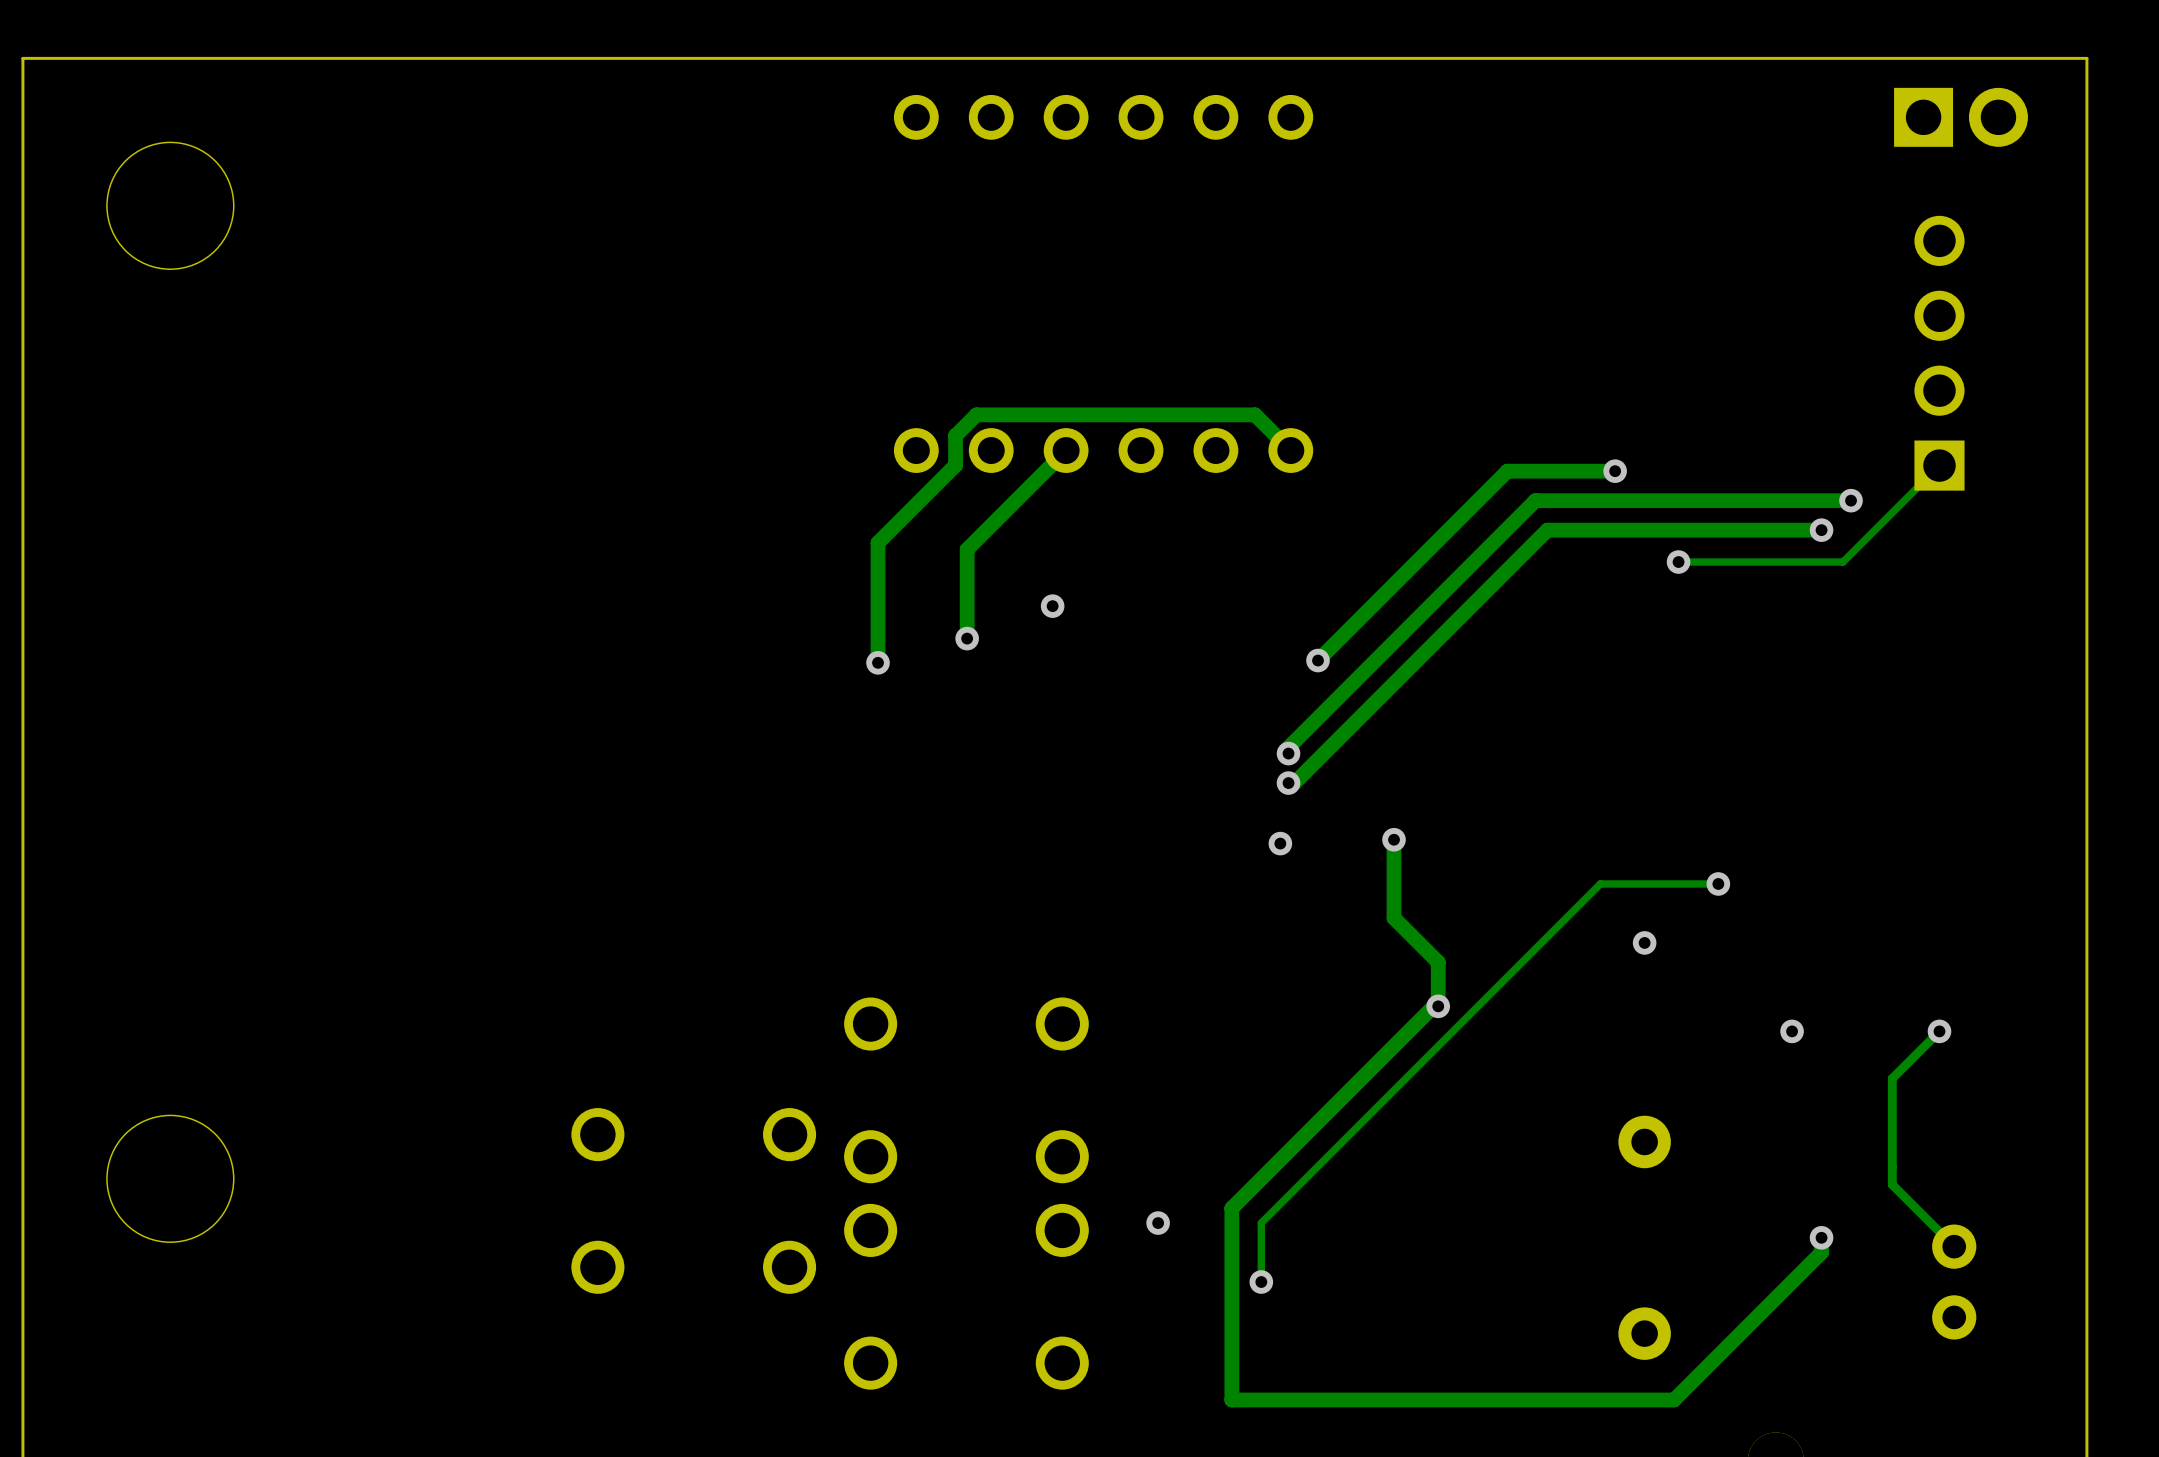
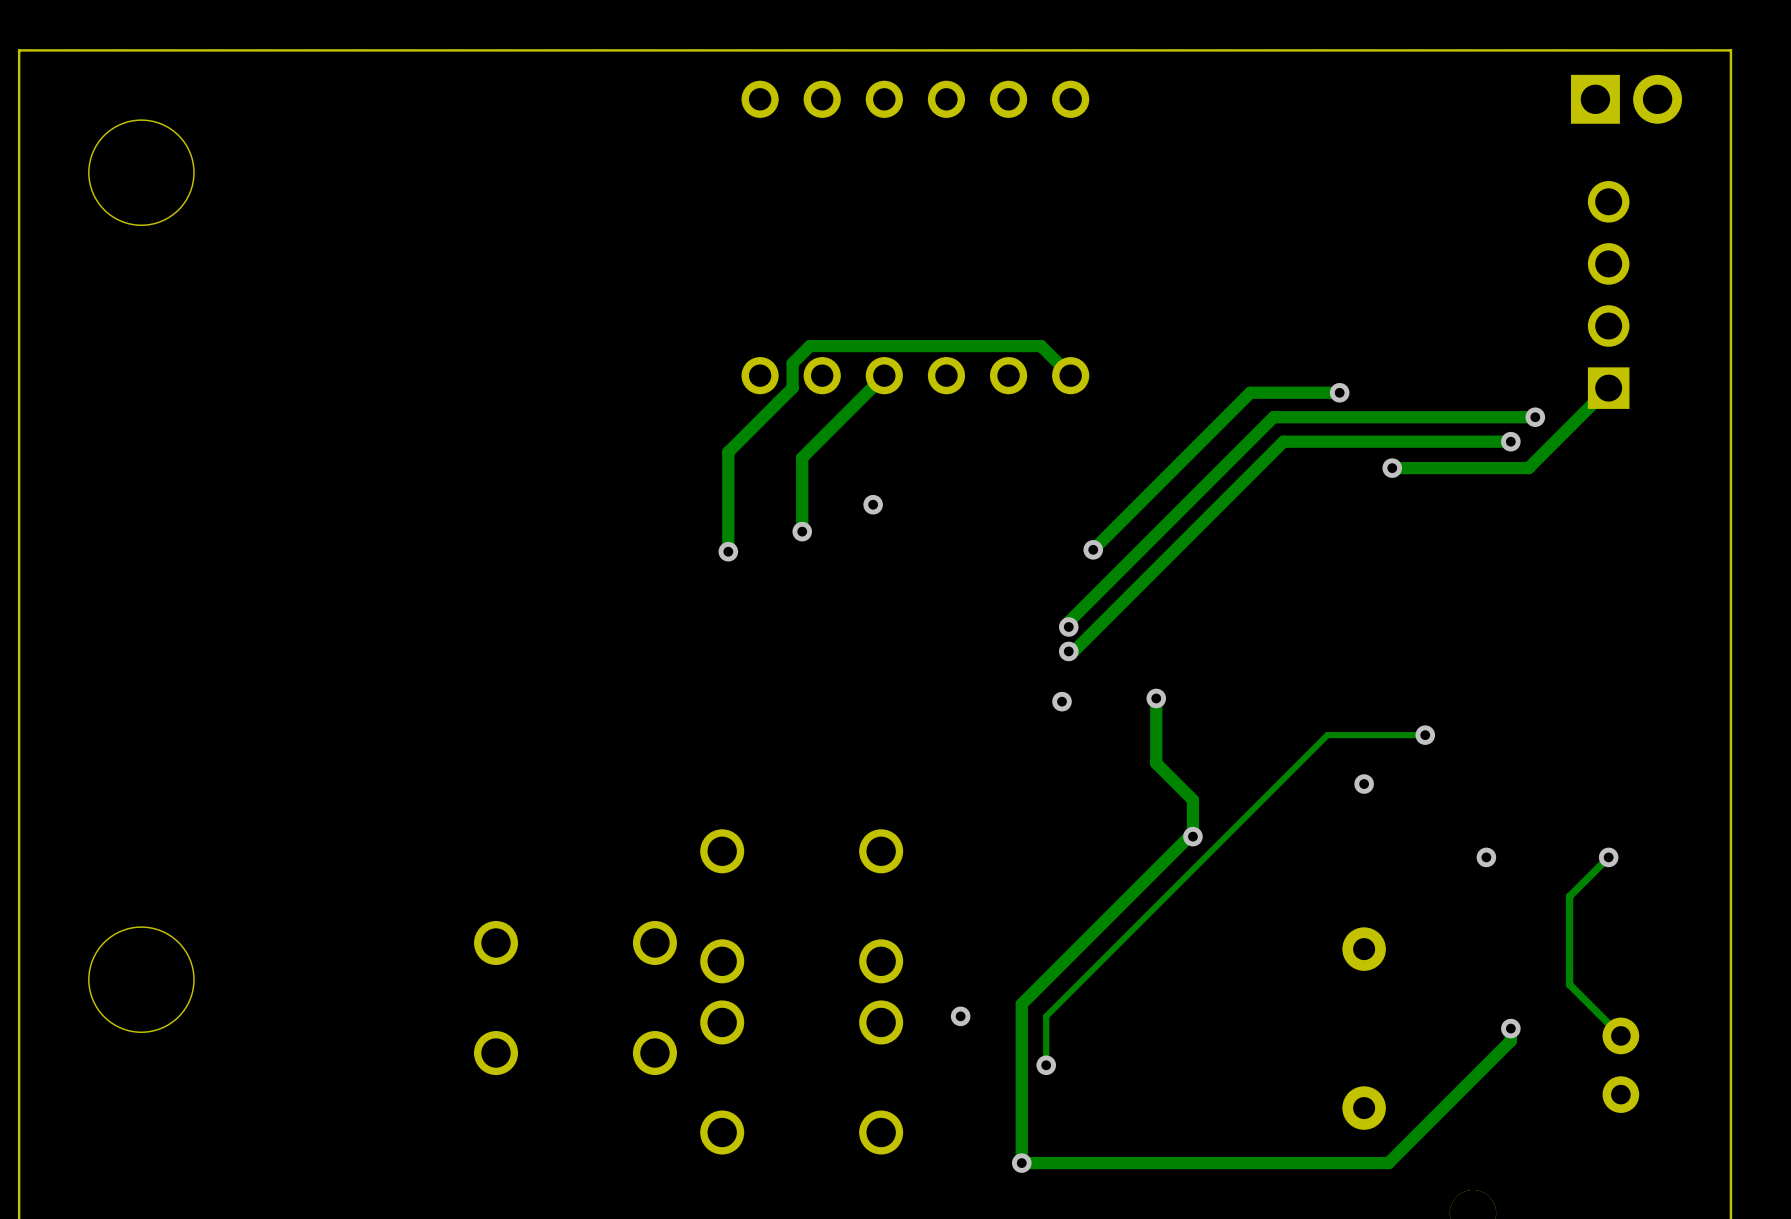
track width: thin (1939, 465) (1843, 562) (1678, 562) -> thick (1608, 388) (1528, 468) (1392, 468)
via: none -> (1021, 1163)

